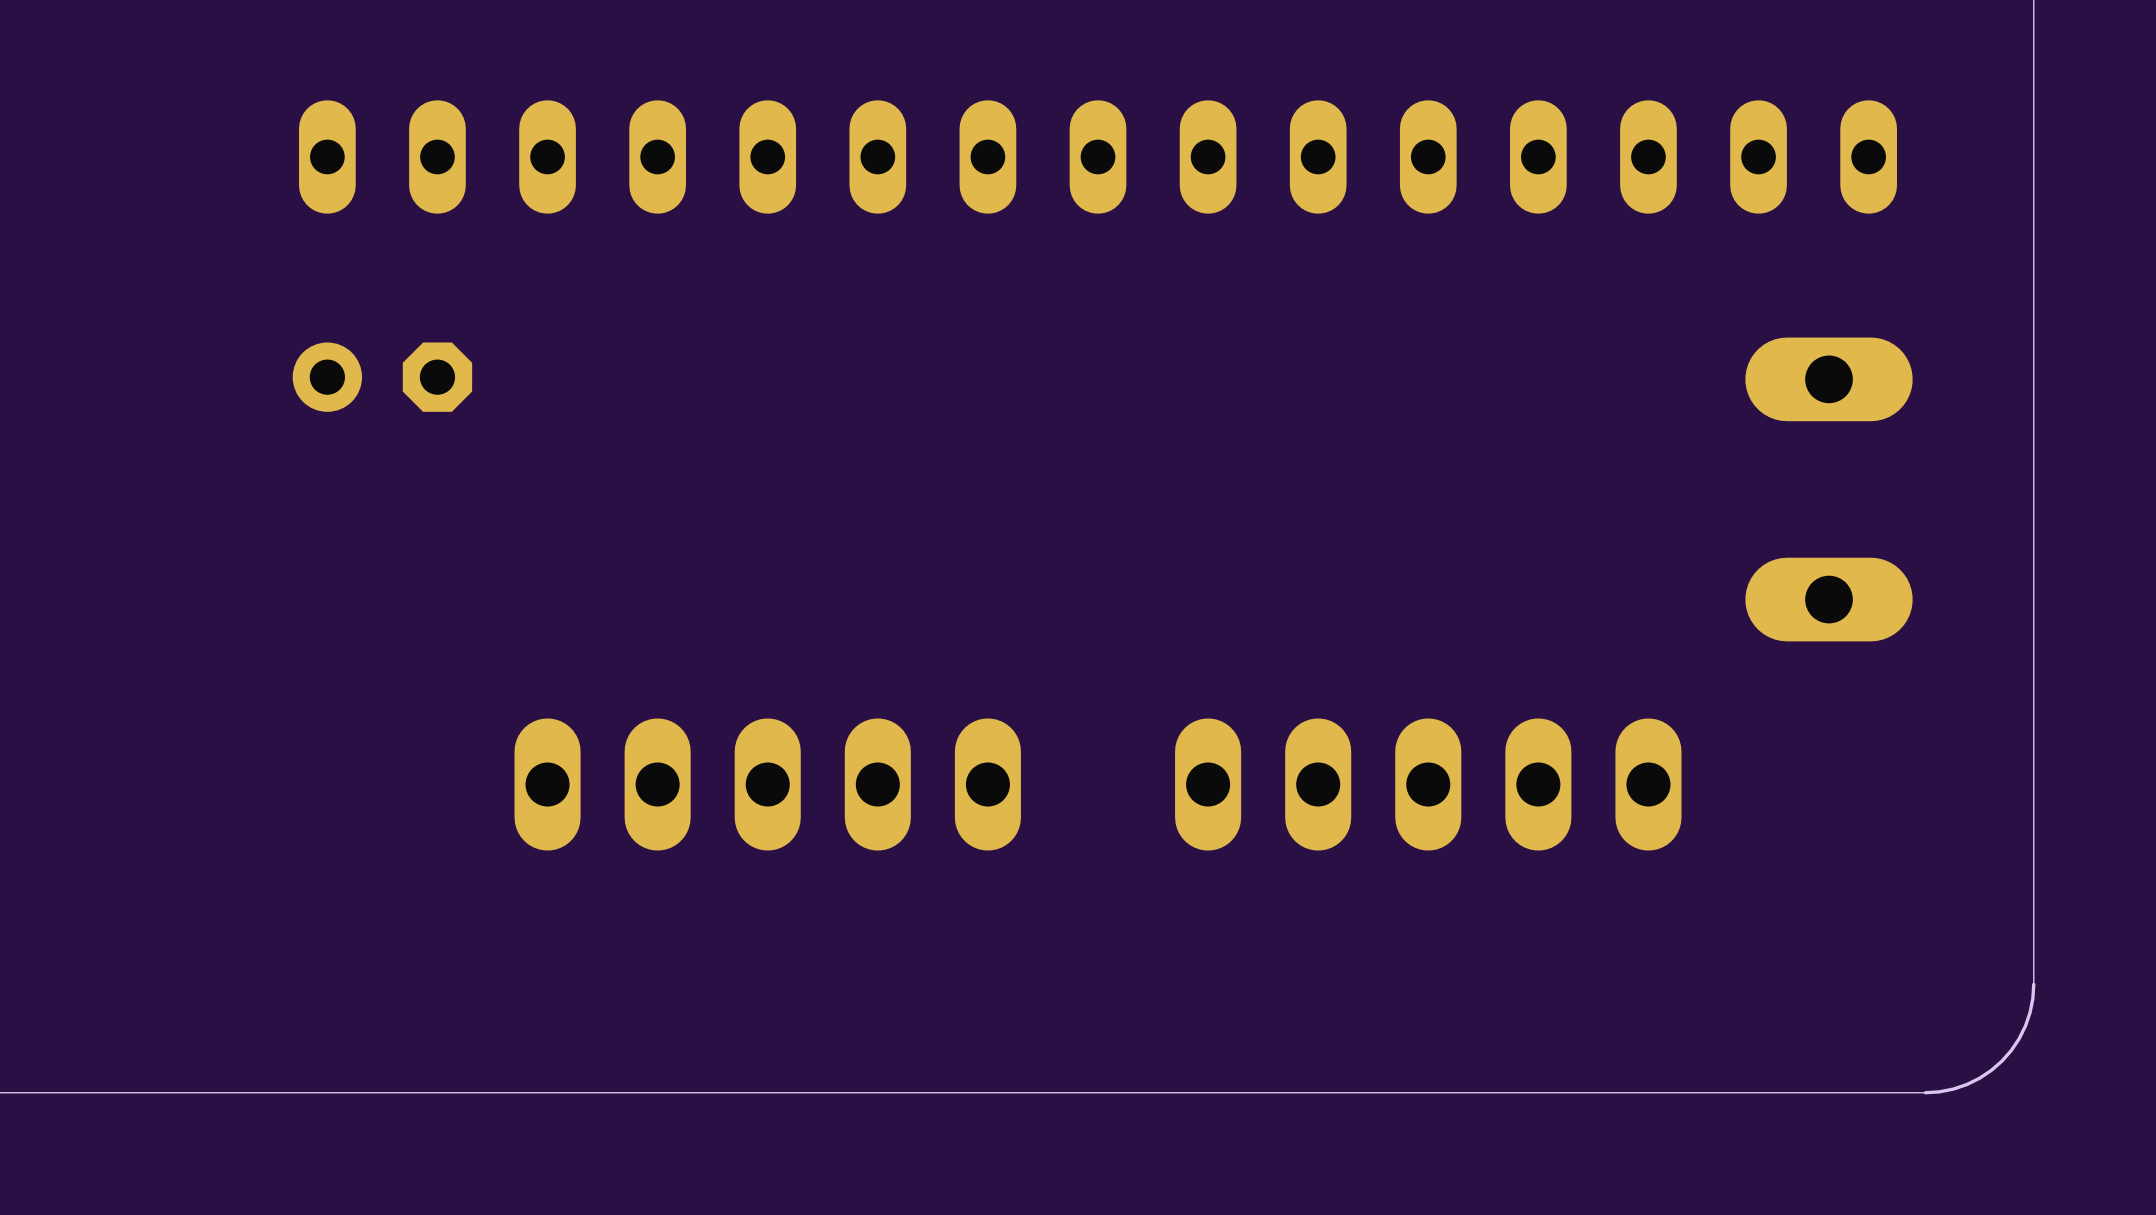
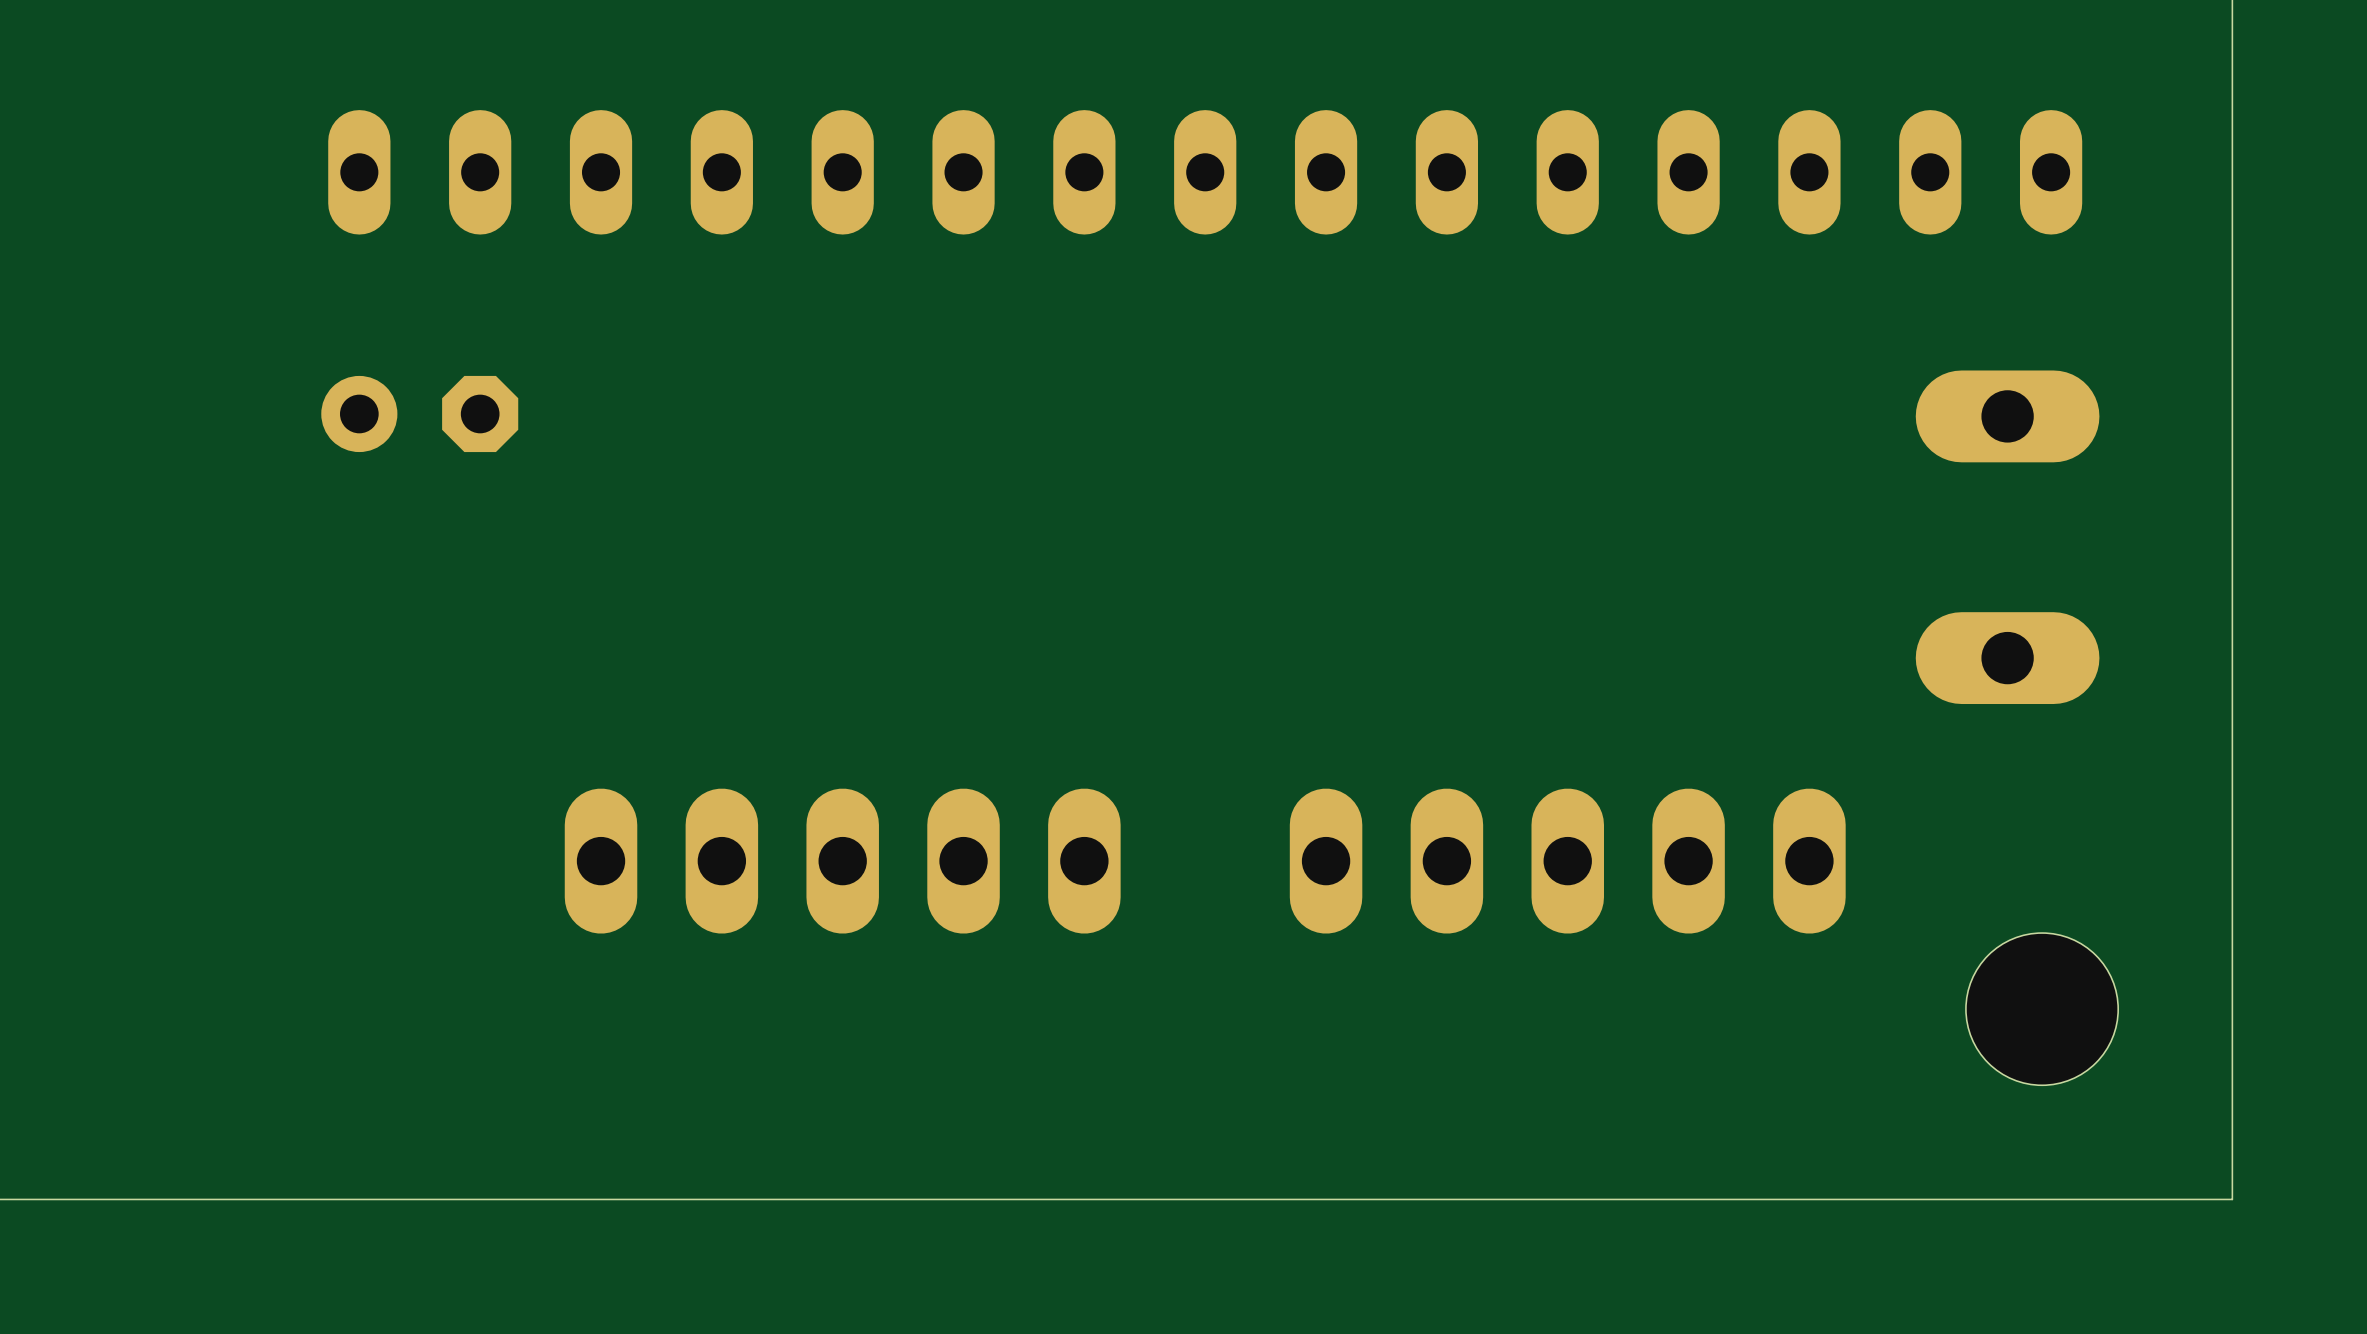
hole: none -> (2042, 1009)
board edge: (2033, 984) (2032, 998) (2025, 1025) (2019, 1038) (2002, 1061) (1979, 1078) (1966, 1084) (1939, 1091) (1925, 1092) -> (2232, 1080) (2232, 1199) (2113, 1199)

